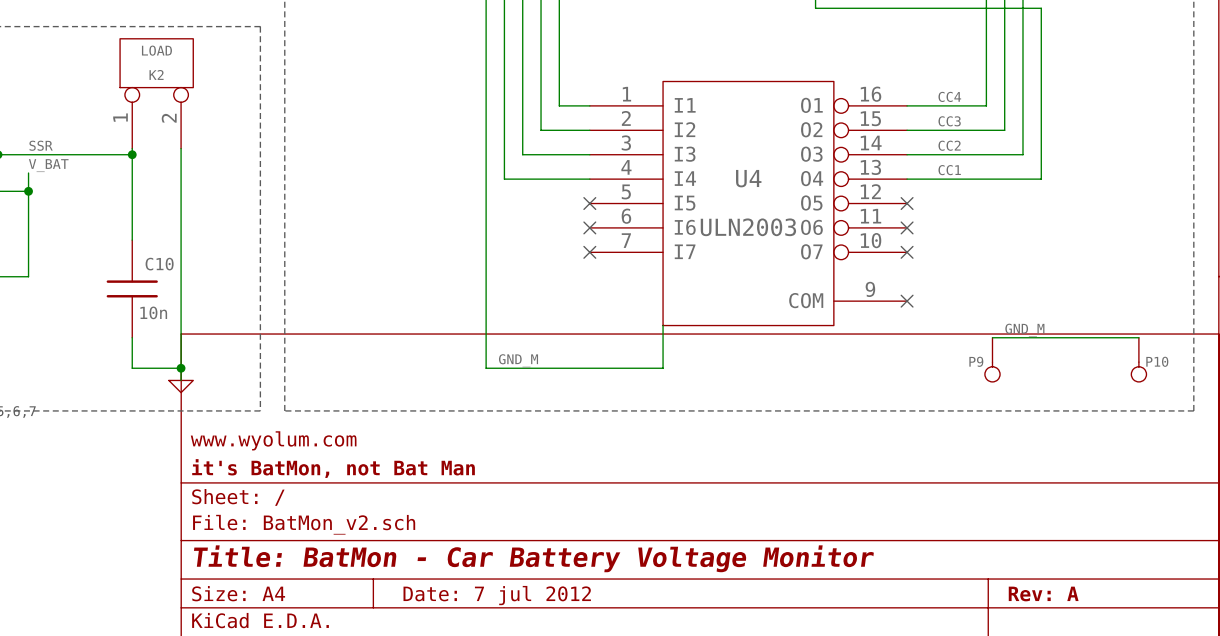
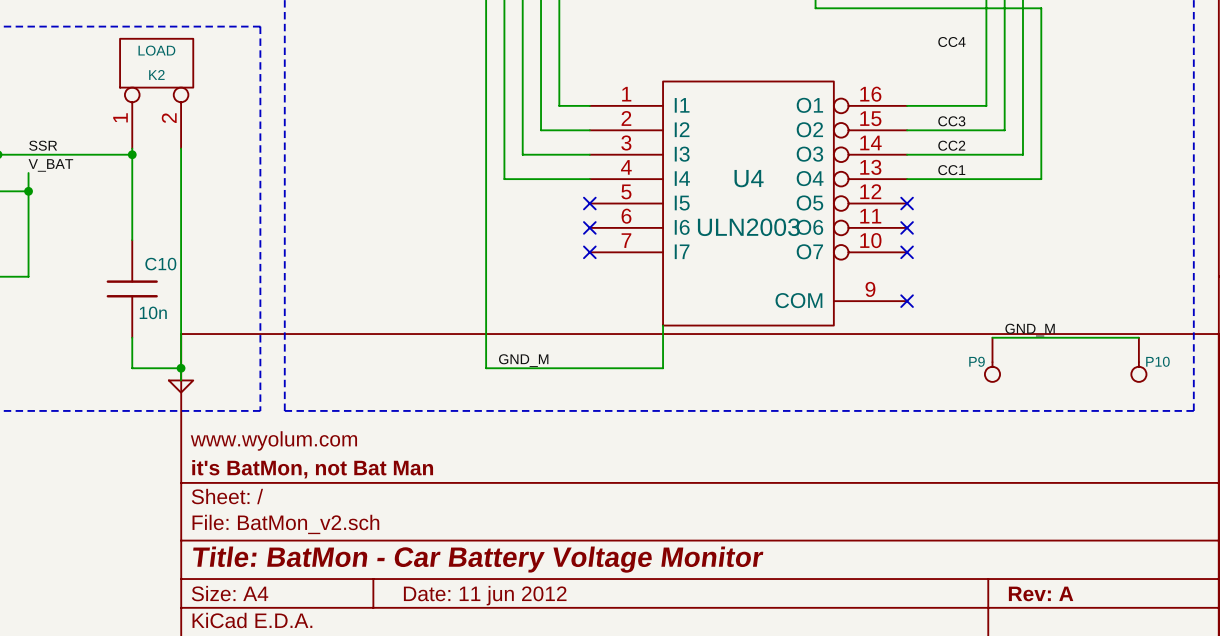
label position: CC4 (949, 96) -> CC4 (951, 41)
title block: Date: 7 jul 2012 (497, 595) -> Date: 11 jun 2012 (485, 595)

